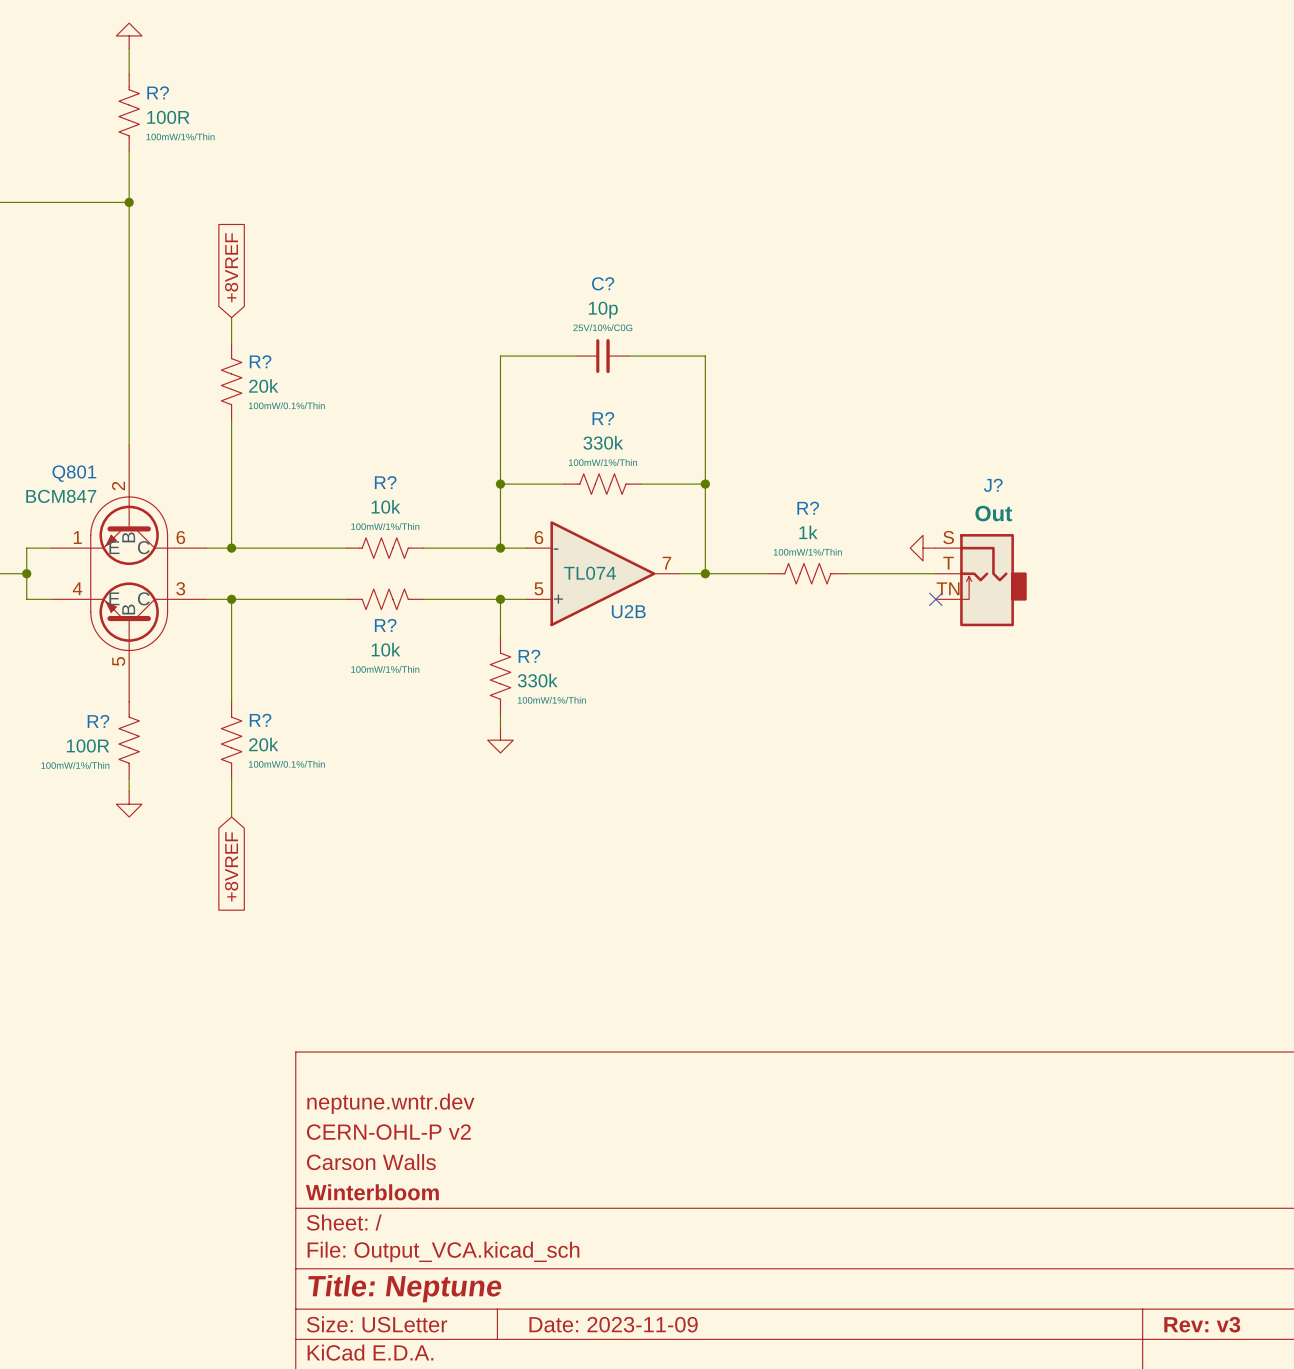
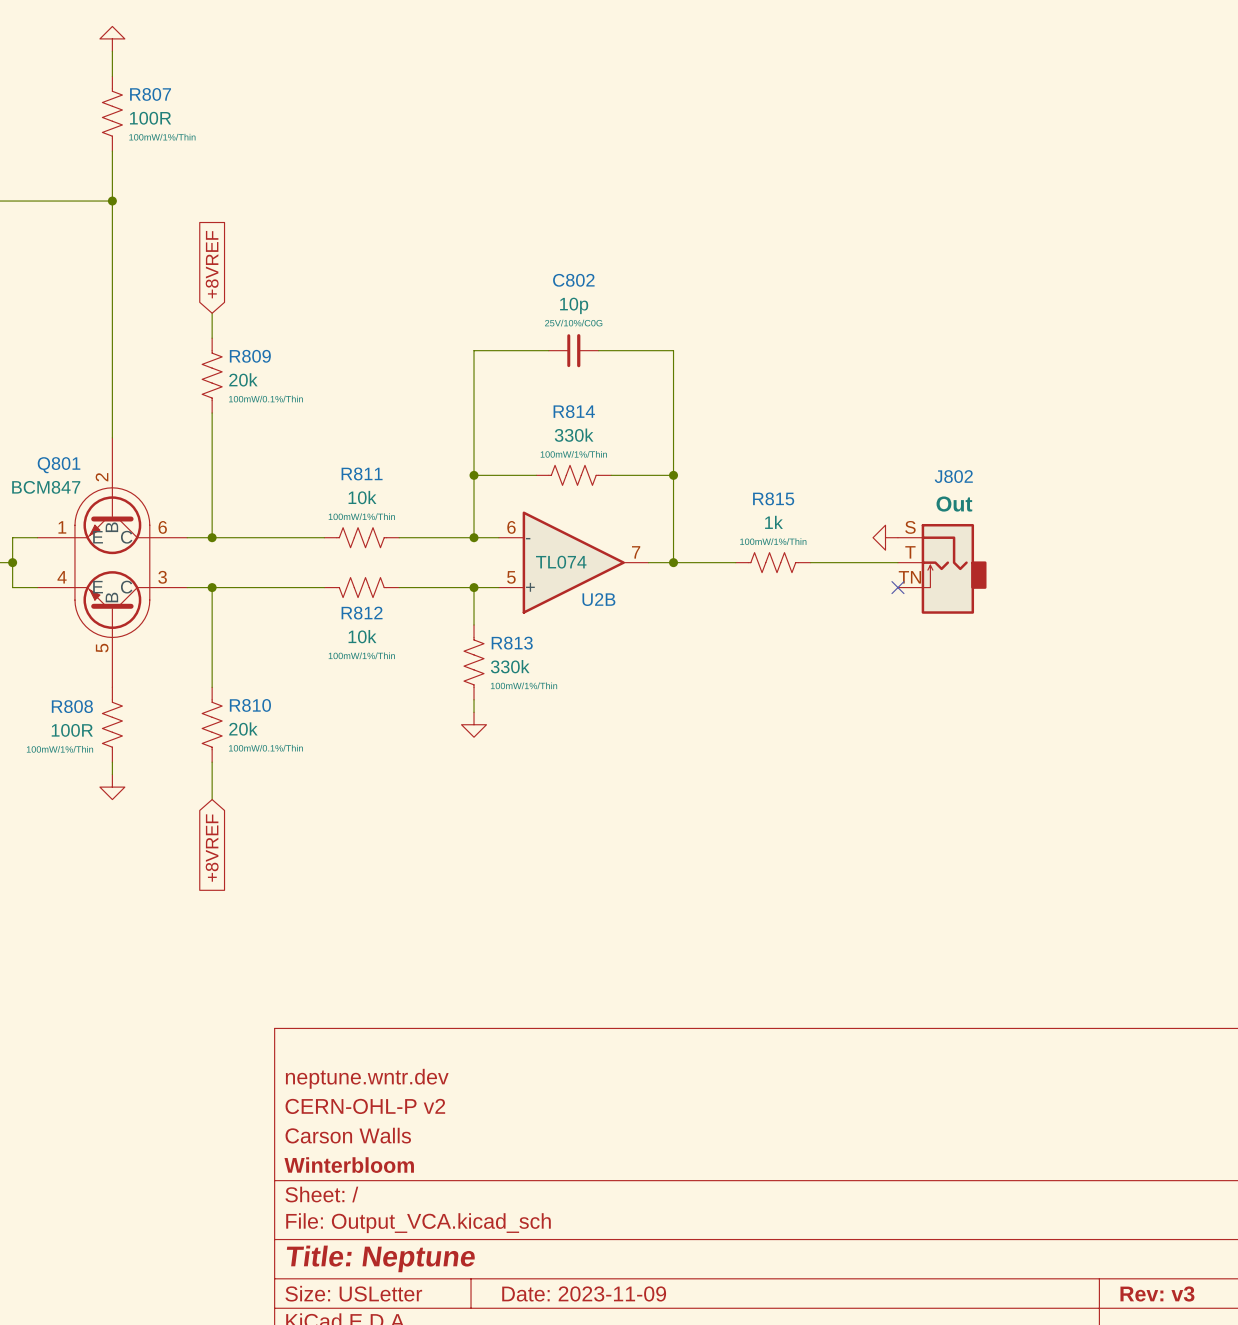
R? name: R? (158, 92) -> R807 (150, 94)
C? name: C? (603, 283) -> C802 (573, 280)
R? name: R? (260, 361) -> R809 (250, 356)
R? name: R? (603, 418) -> R814 (574, 411)
R? name: R? (385, 482) -> R811 (362, 473)
J? name: J? (993, 485) -> J802 (953, 476)
R? name: R? (808, 508) -> R815 (773, 498)
R? name: R? (385, 625) -> R812 (362, 613)
R? name: R? (529, 656) -> R813 (512, 643)
R? name: R? (260, 720) -> R810 (250, 705)
R? name: R? (98, 721) -> R808 (72, 706)

